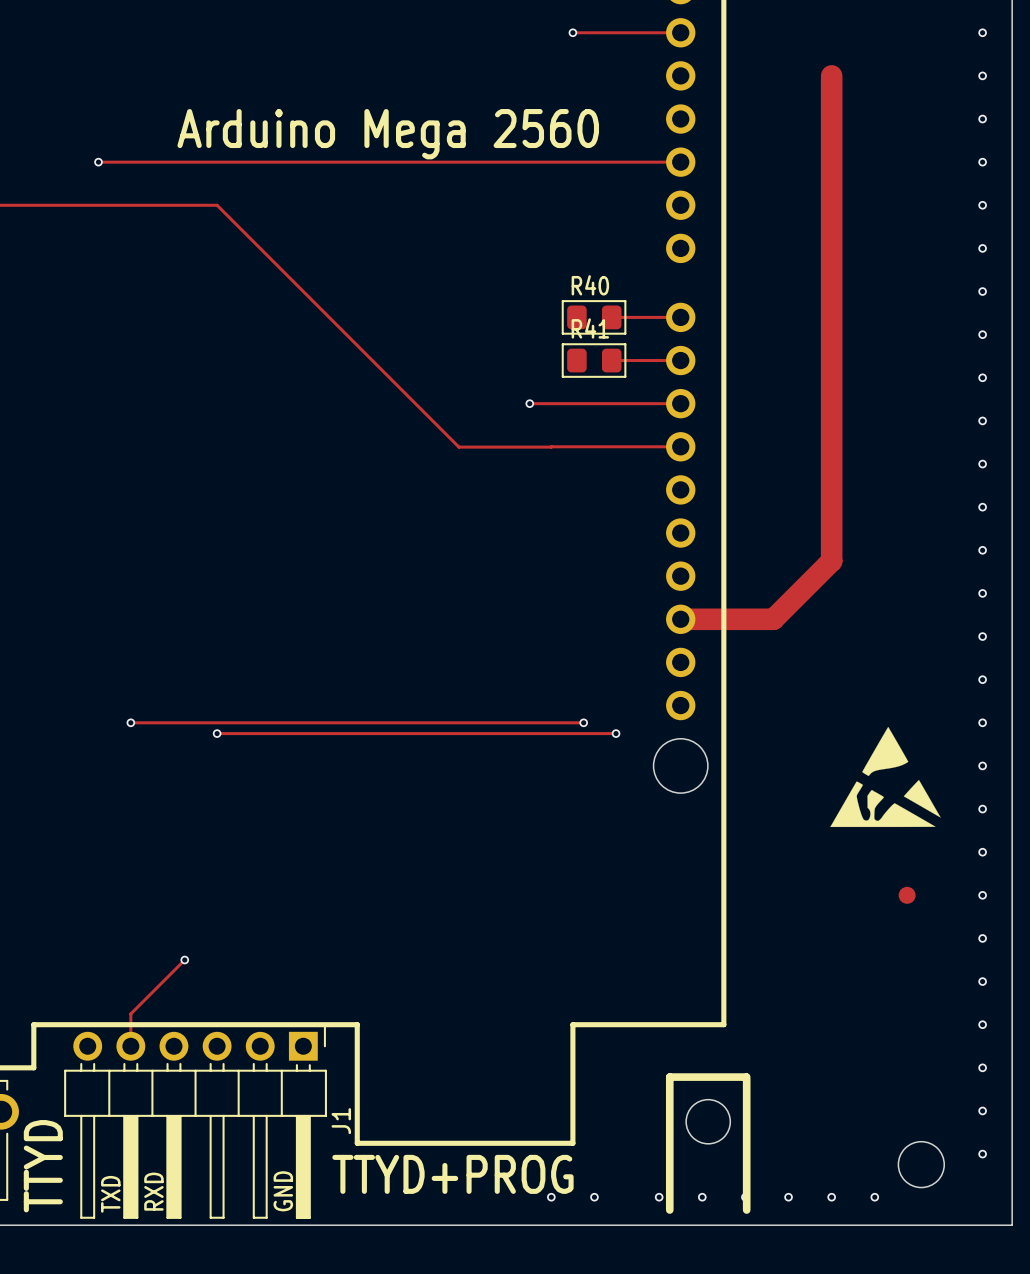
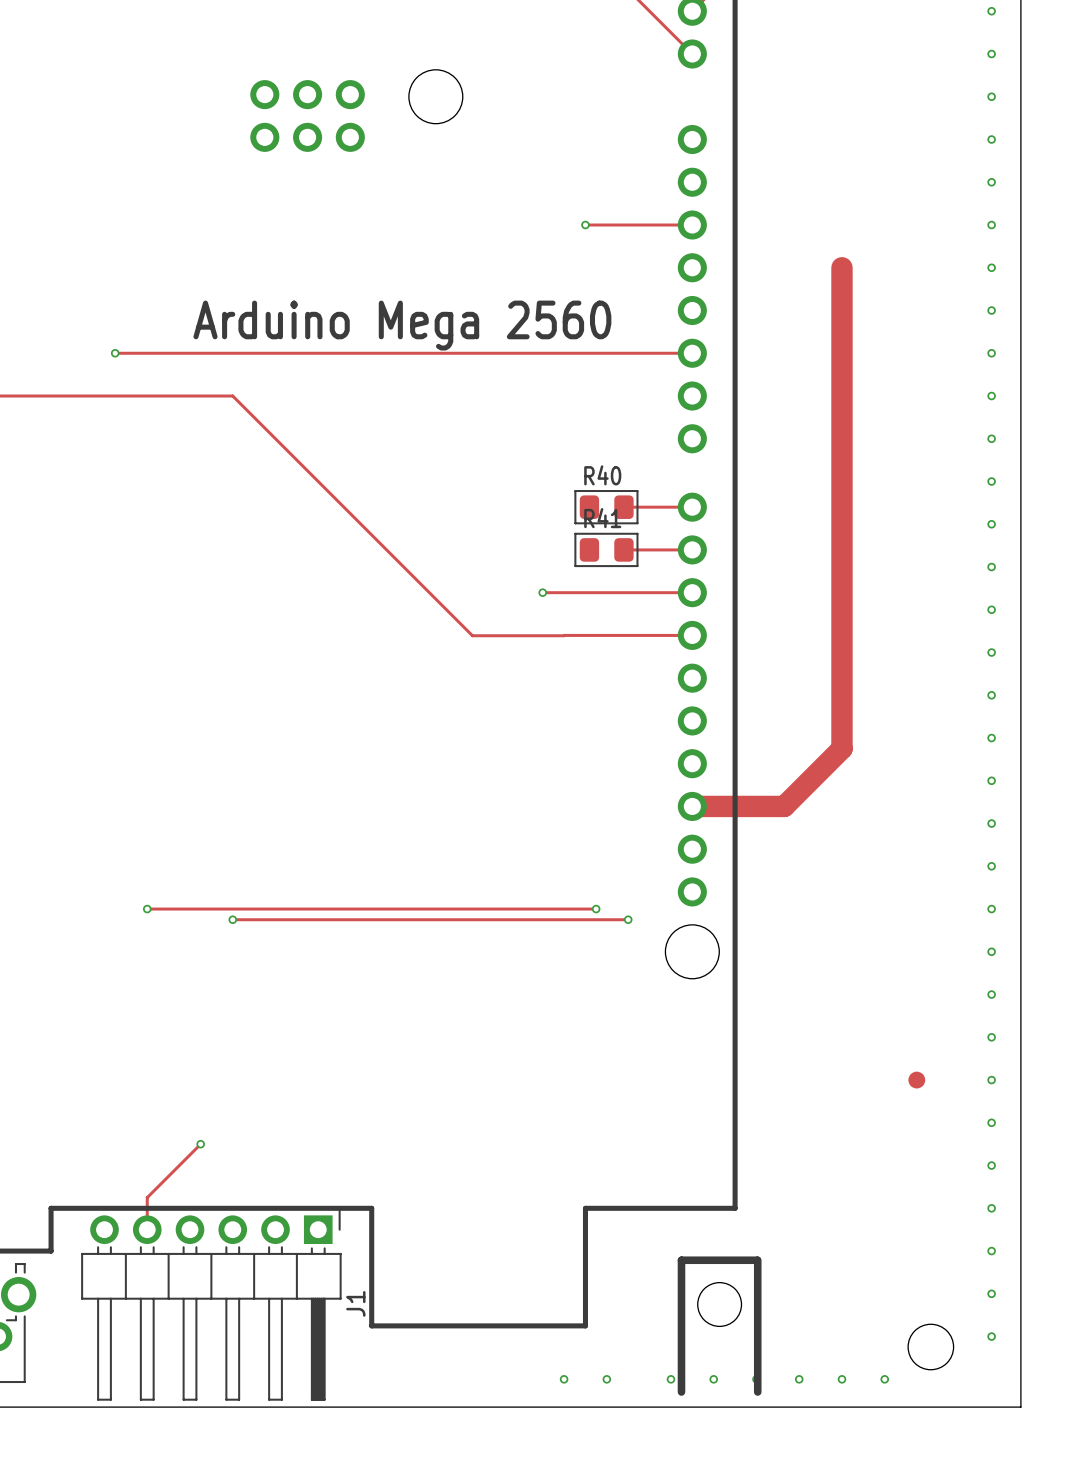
drawing: [830, 726, 941, 828] -> none
drawing: [123, 1115, 139, 1219] -> none
drawing: [166, 1115, 182, 1219] -> none
text: TTYD (43, 1166) -> none
text: TTYD+PROG (452, 1174) -> none
text: RXD (153, 1191) -> none
text: GND (283, 1191) -> none
text: TXD (110, 1194) -> none

